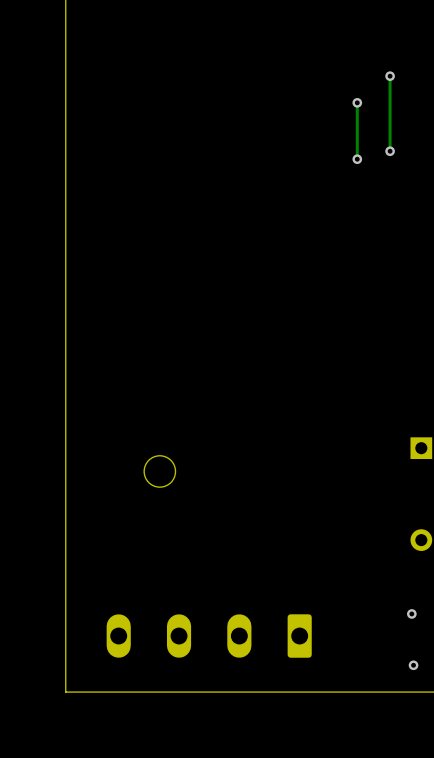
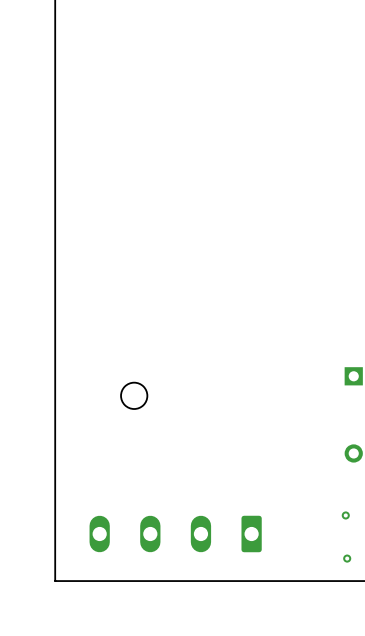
track: (390, 76) (390, 151) -> none
via: (390, 76) -> none
track: (357, 102) (357, 159) -> none
via: (357, 102) -> none
via: (390, 151) -> none
via: (357, 159) -> none

